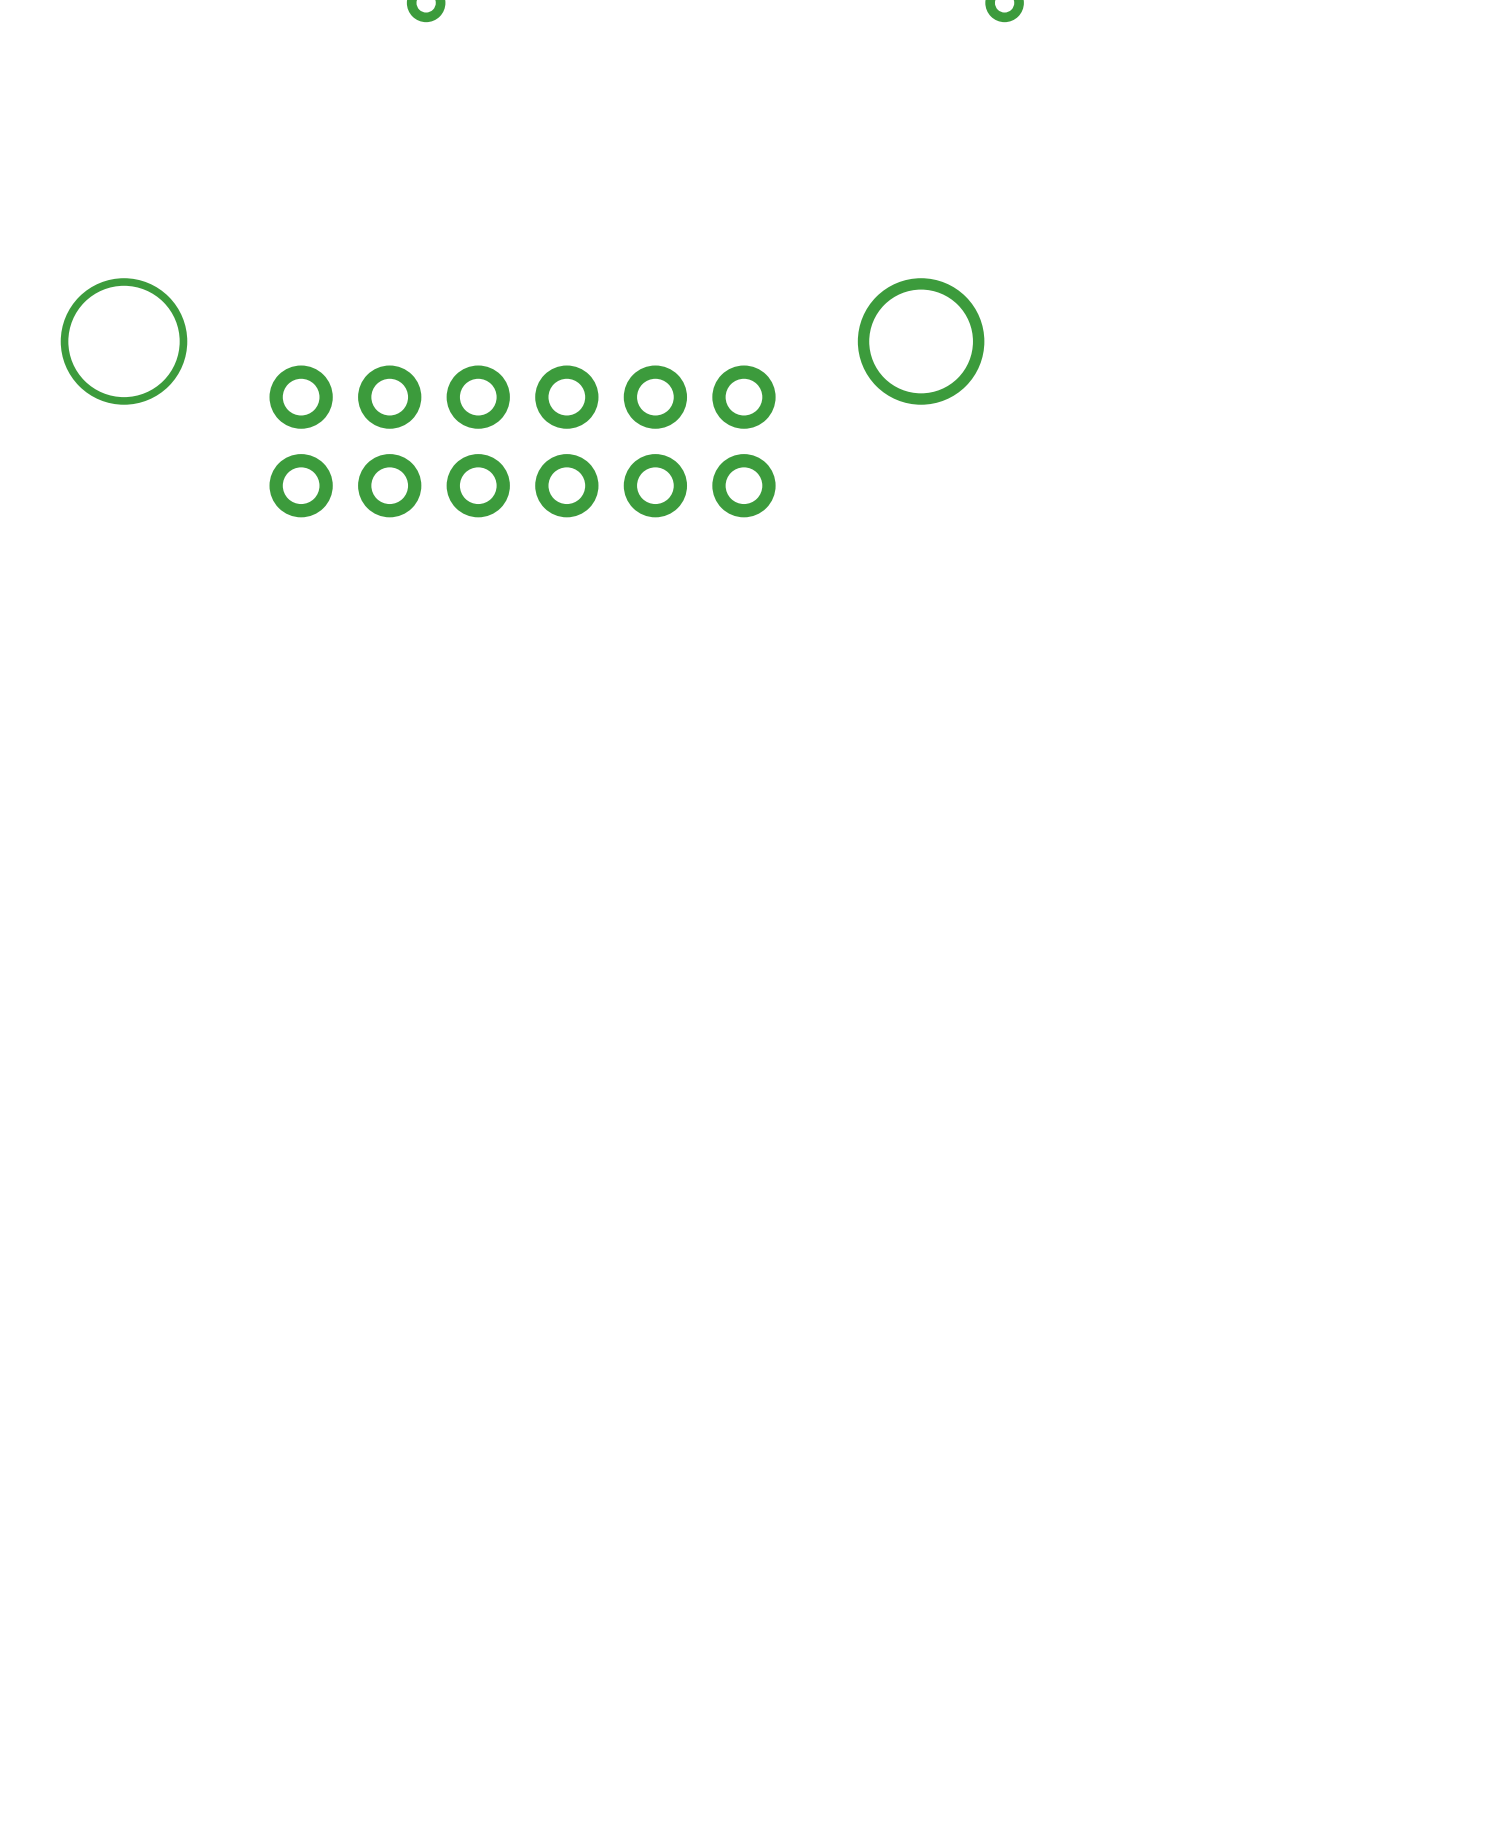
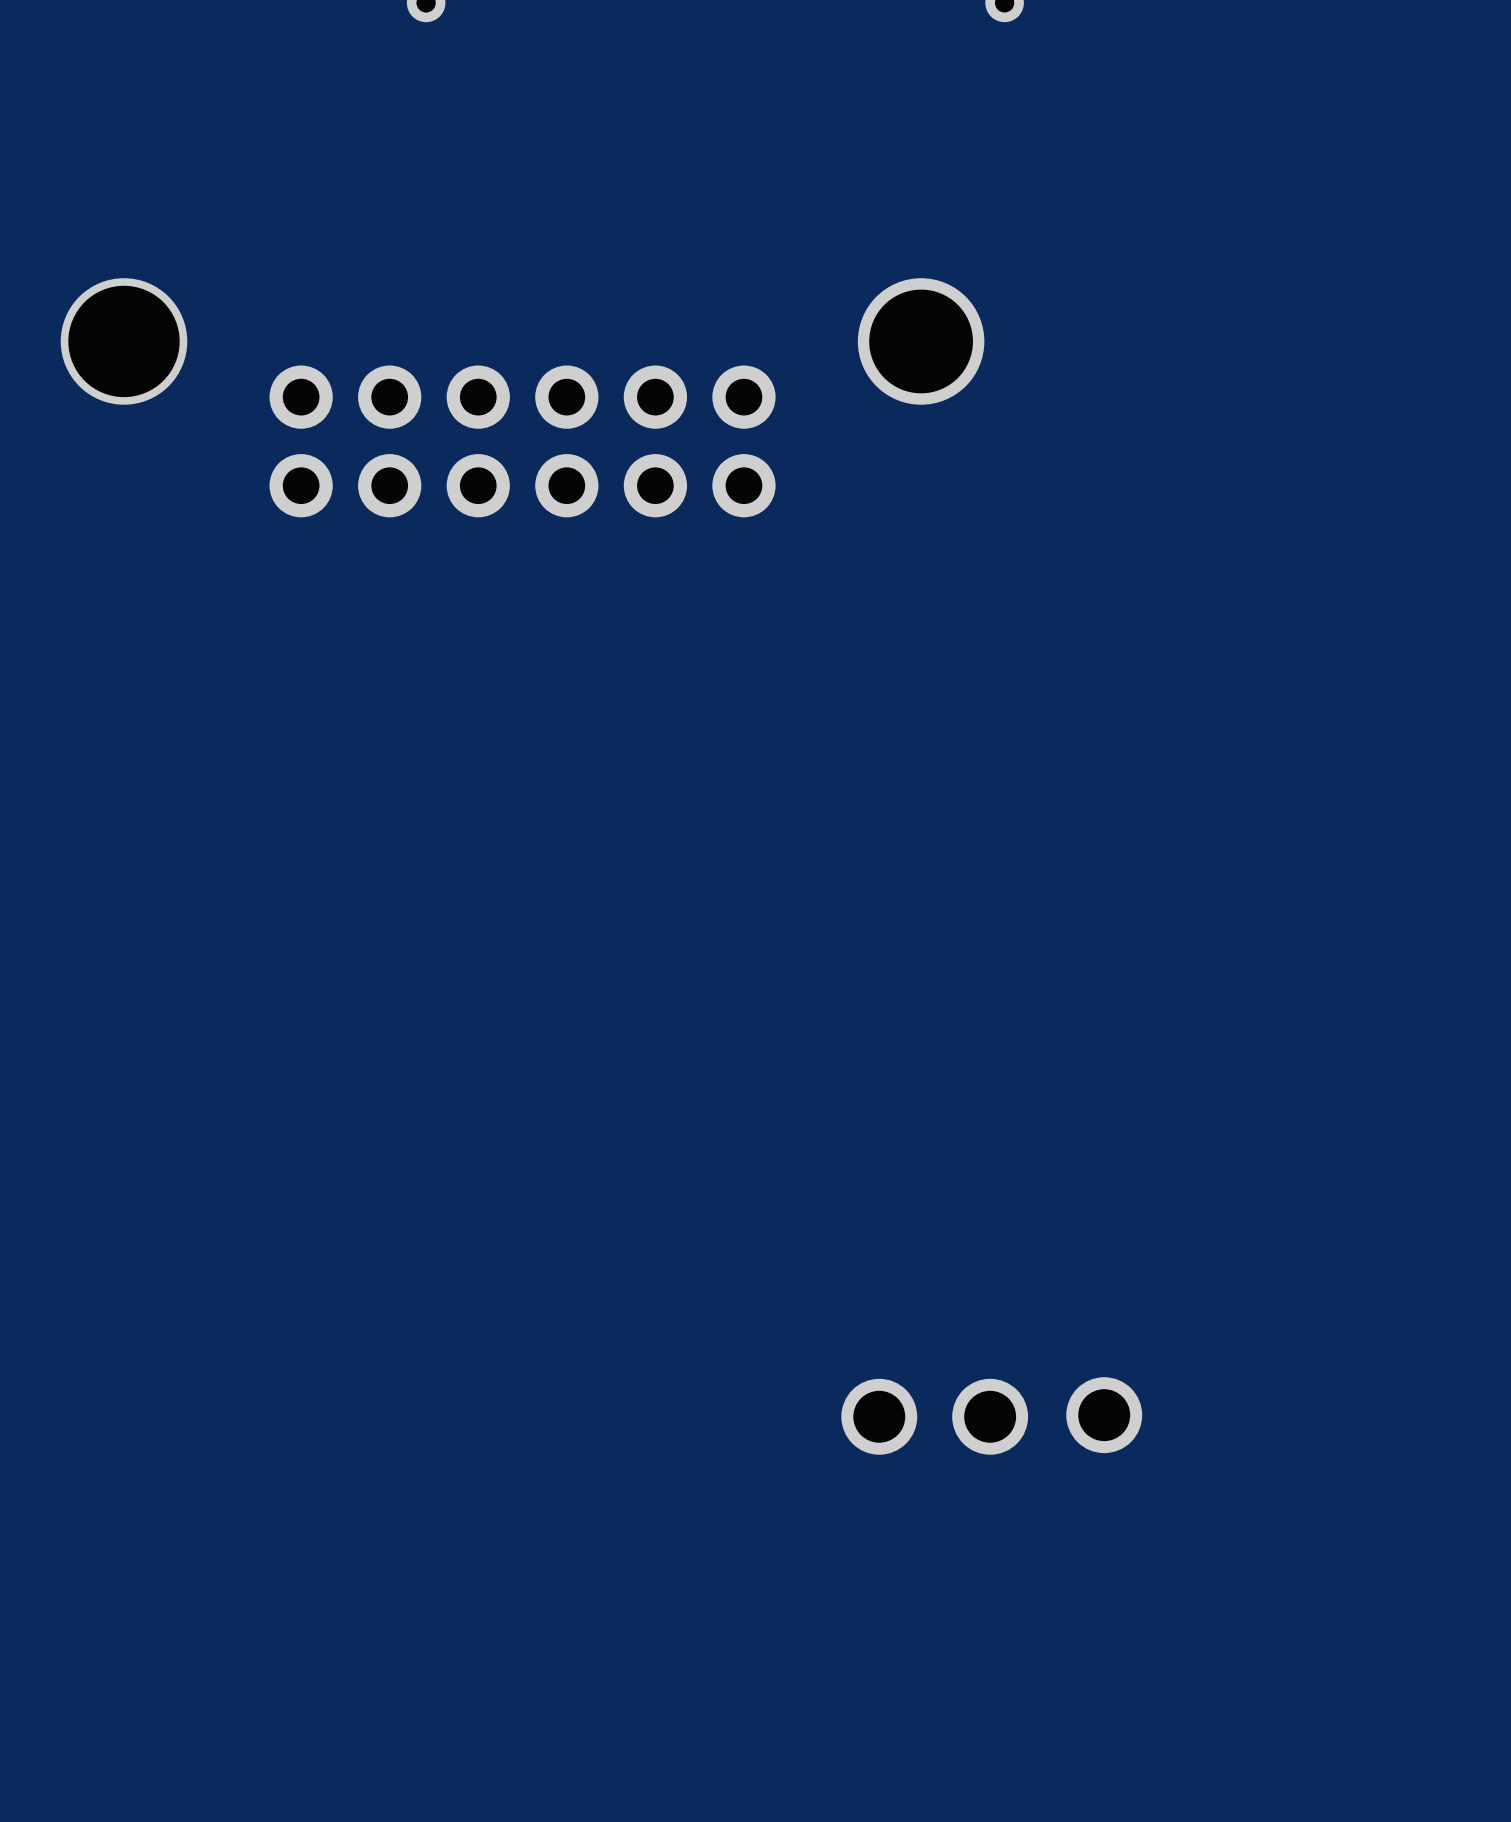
part: none -> (1104, 1415)
part: none -> (879, 1416)
part: none -> (990, 1416)

